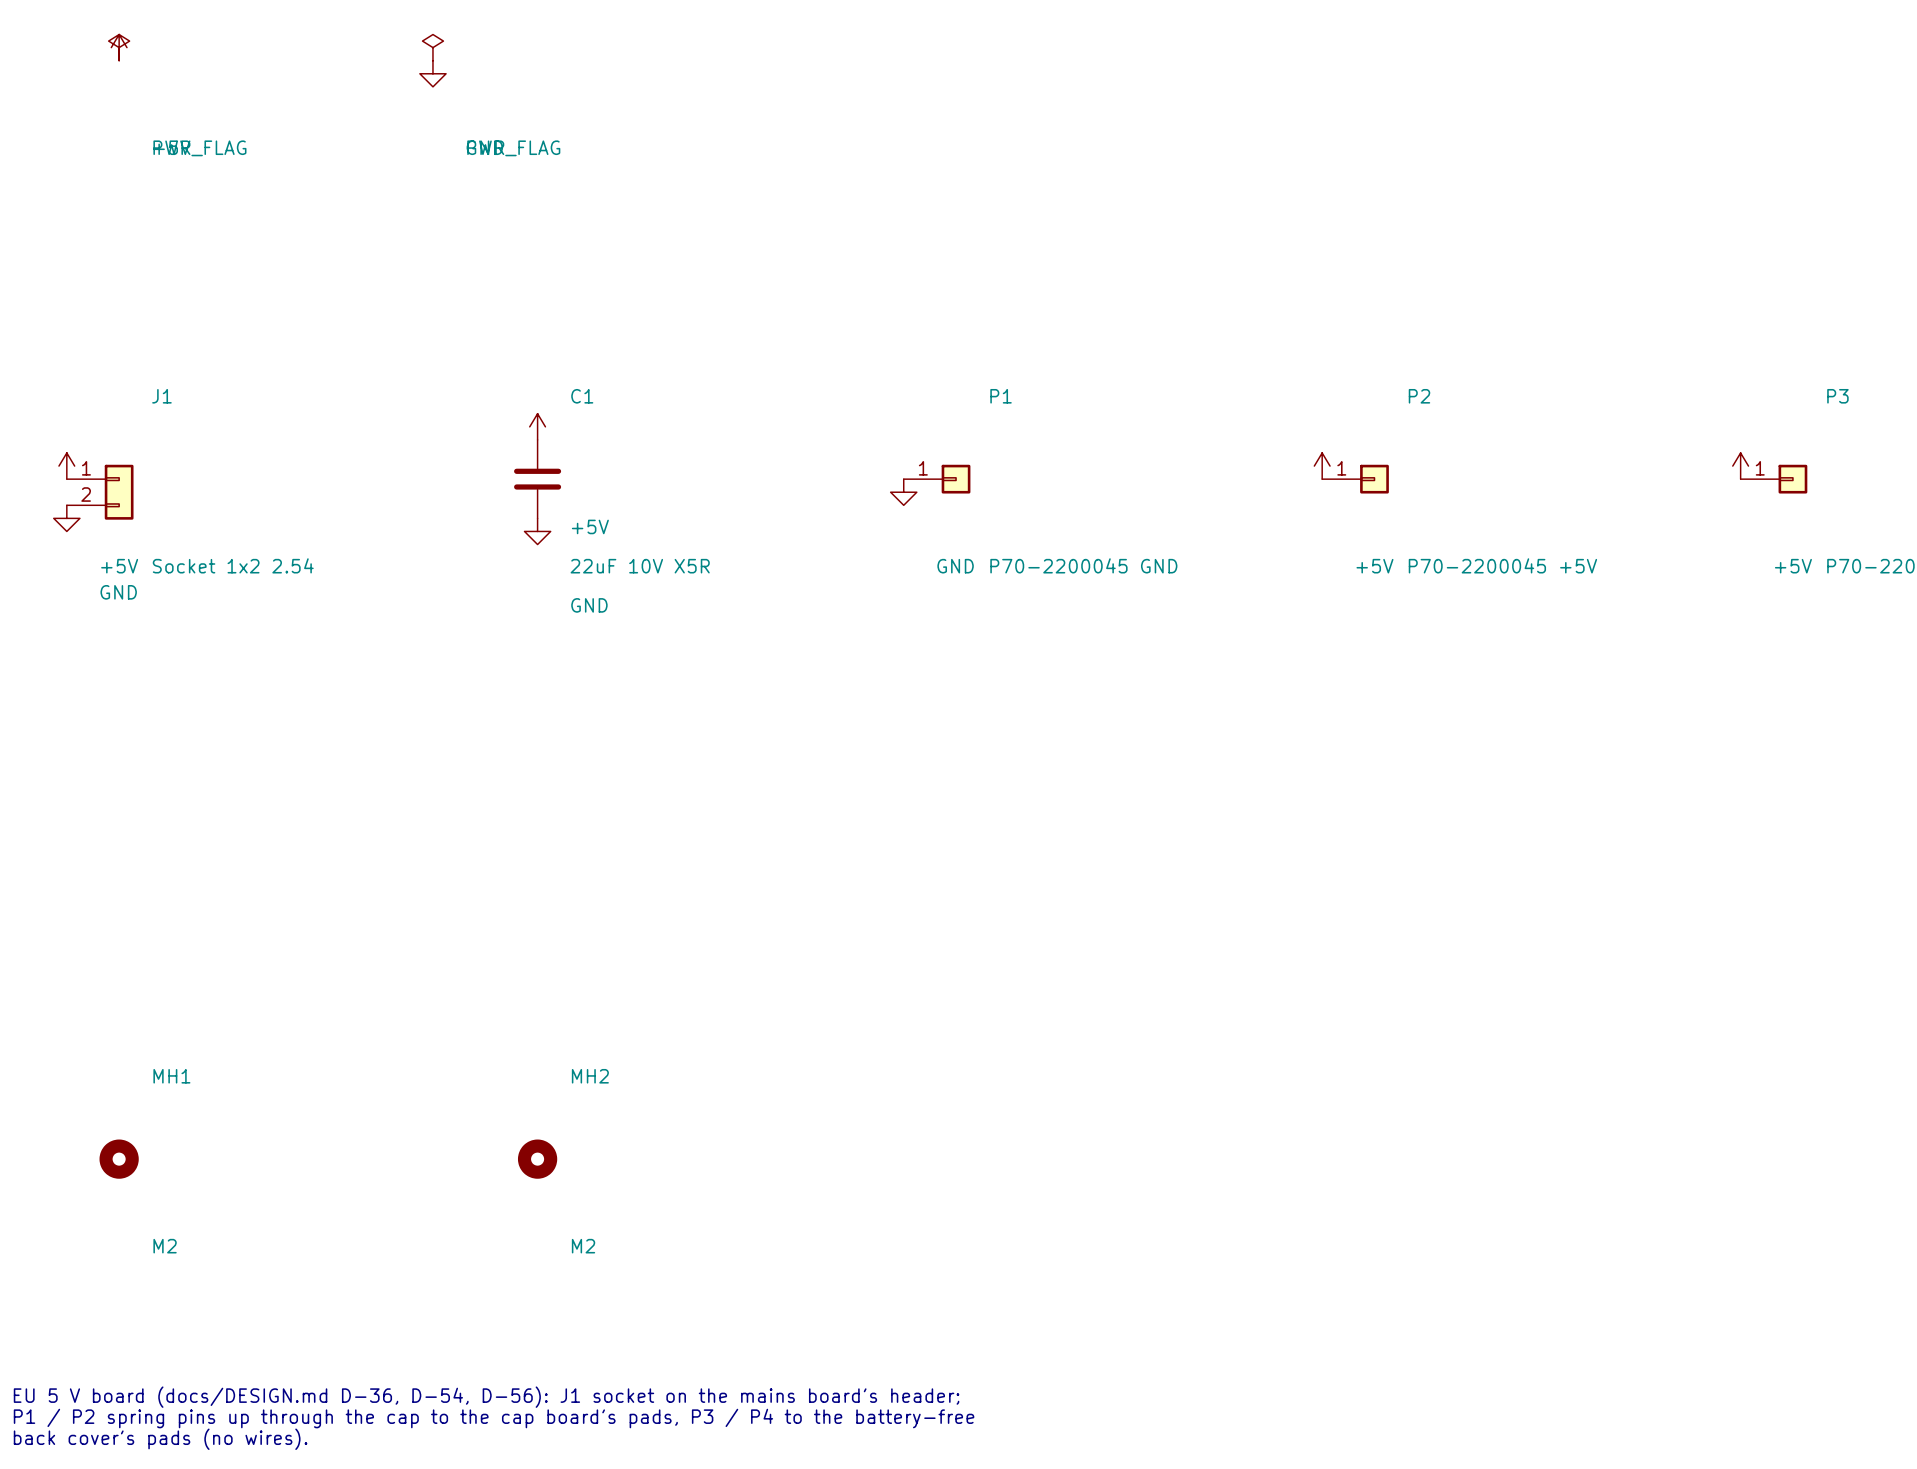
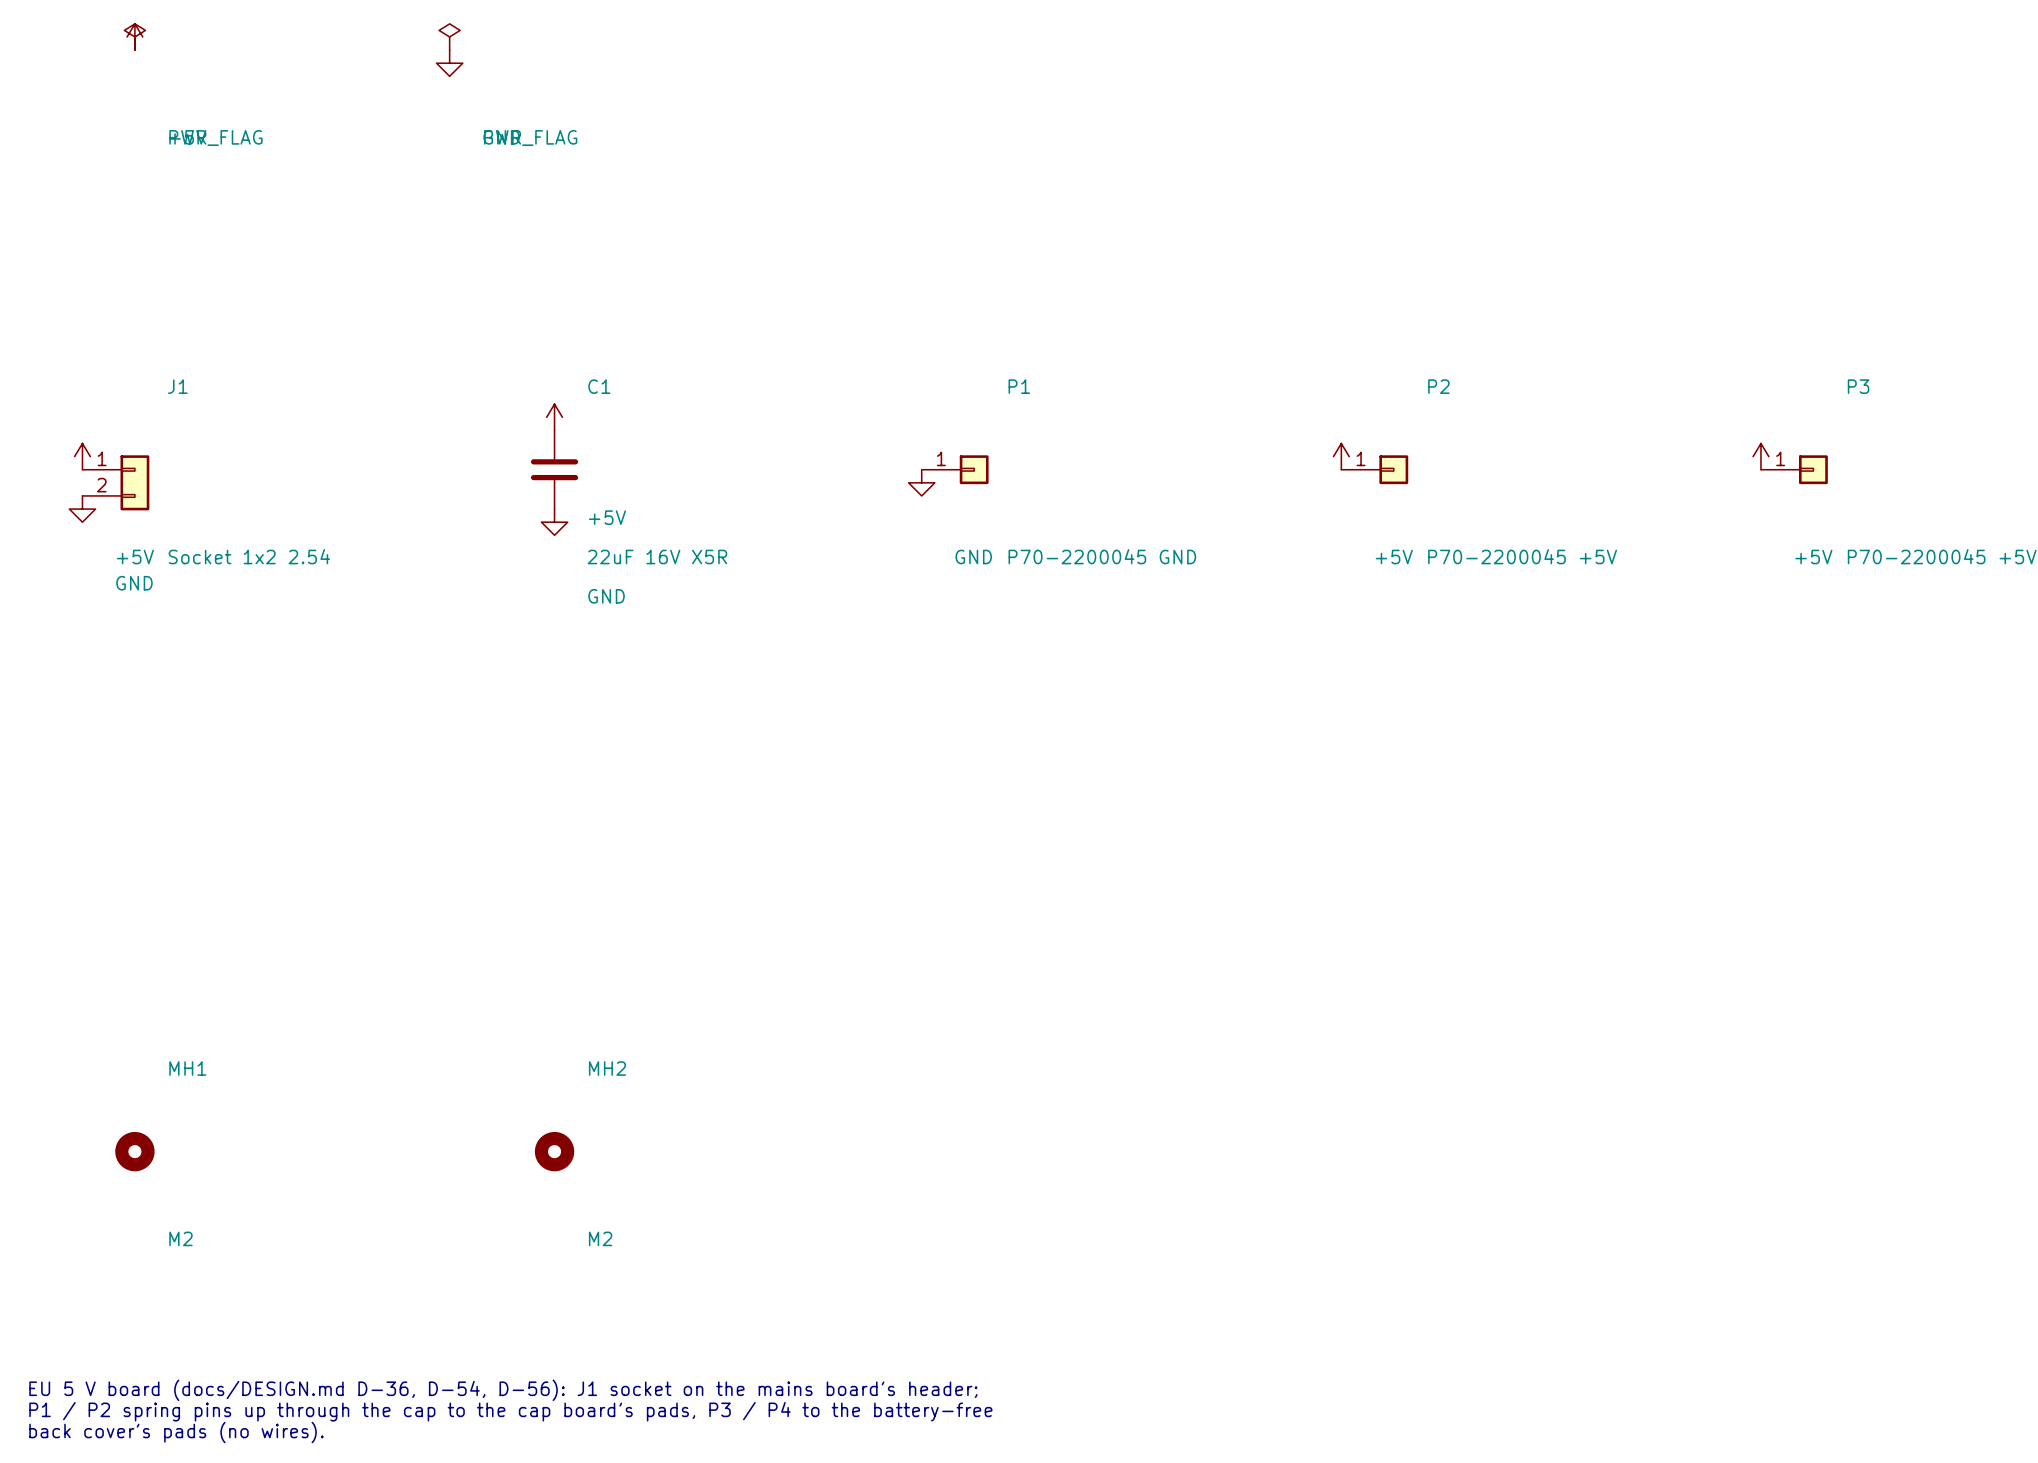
C1 value: 22uF 10V X5R (640, 566) -> 22uF 16V X5R (657, 557)

